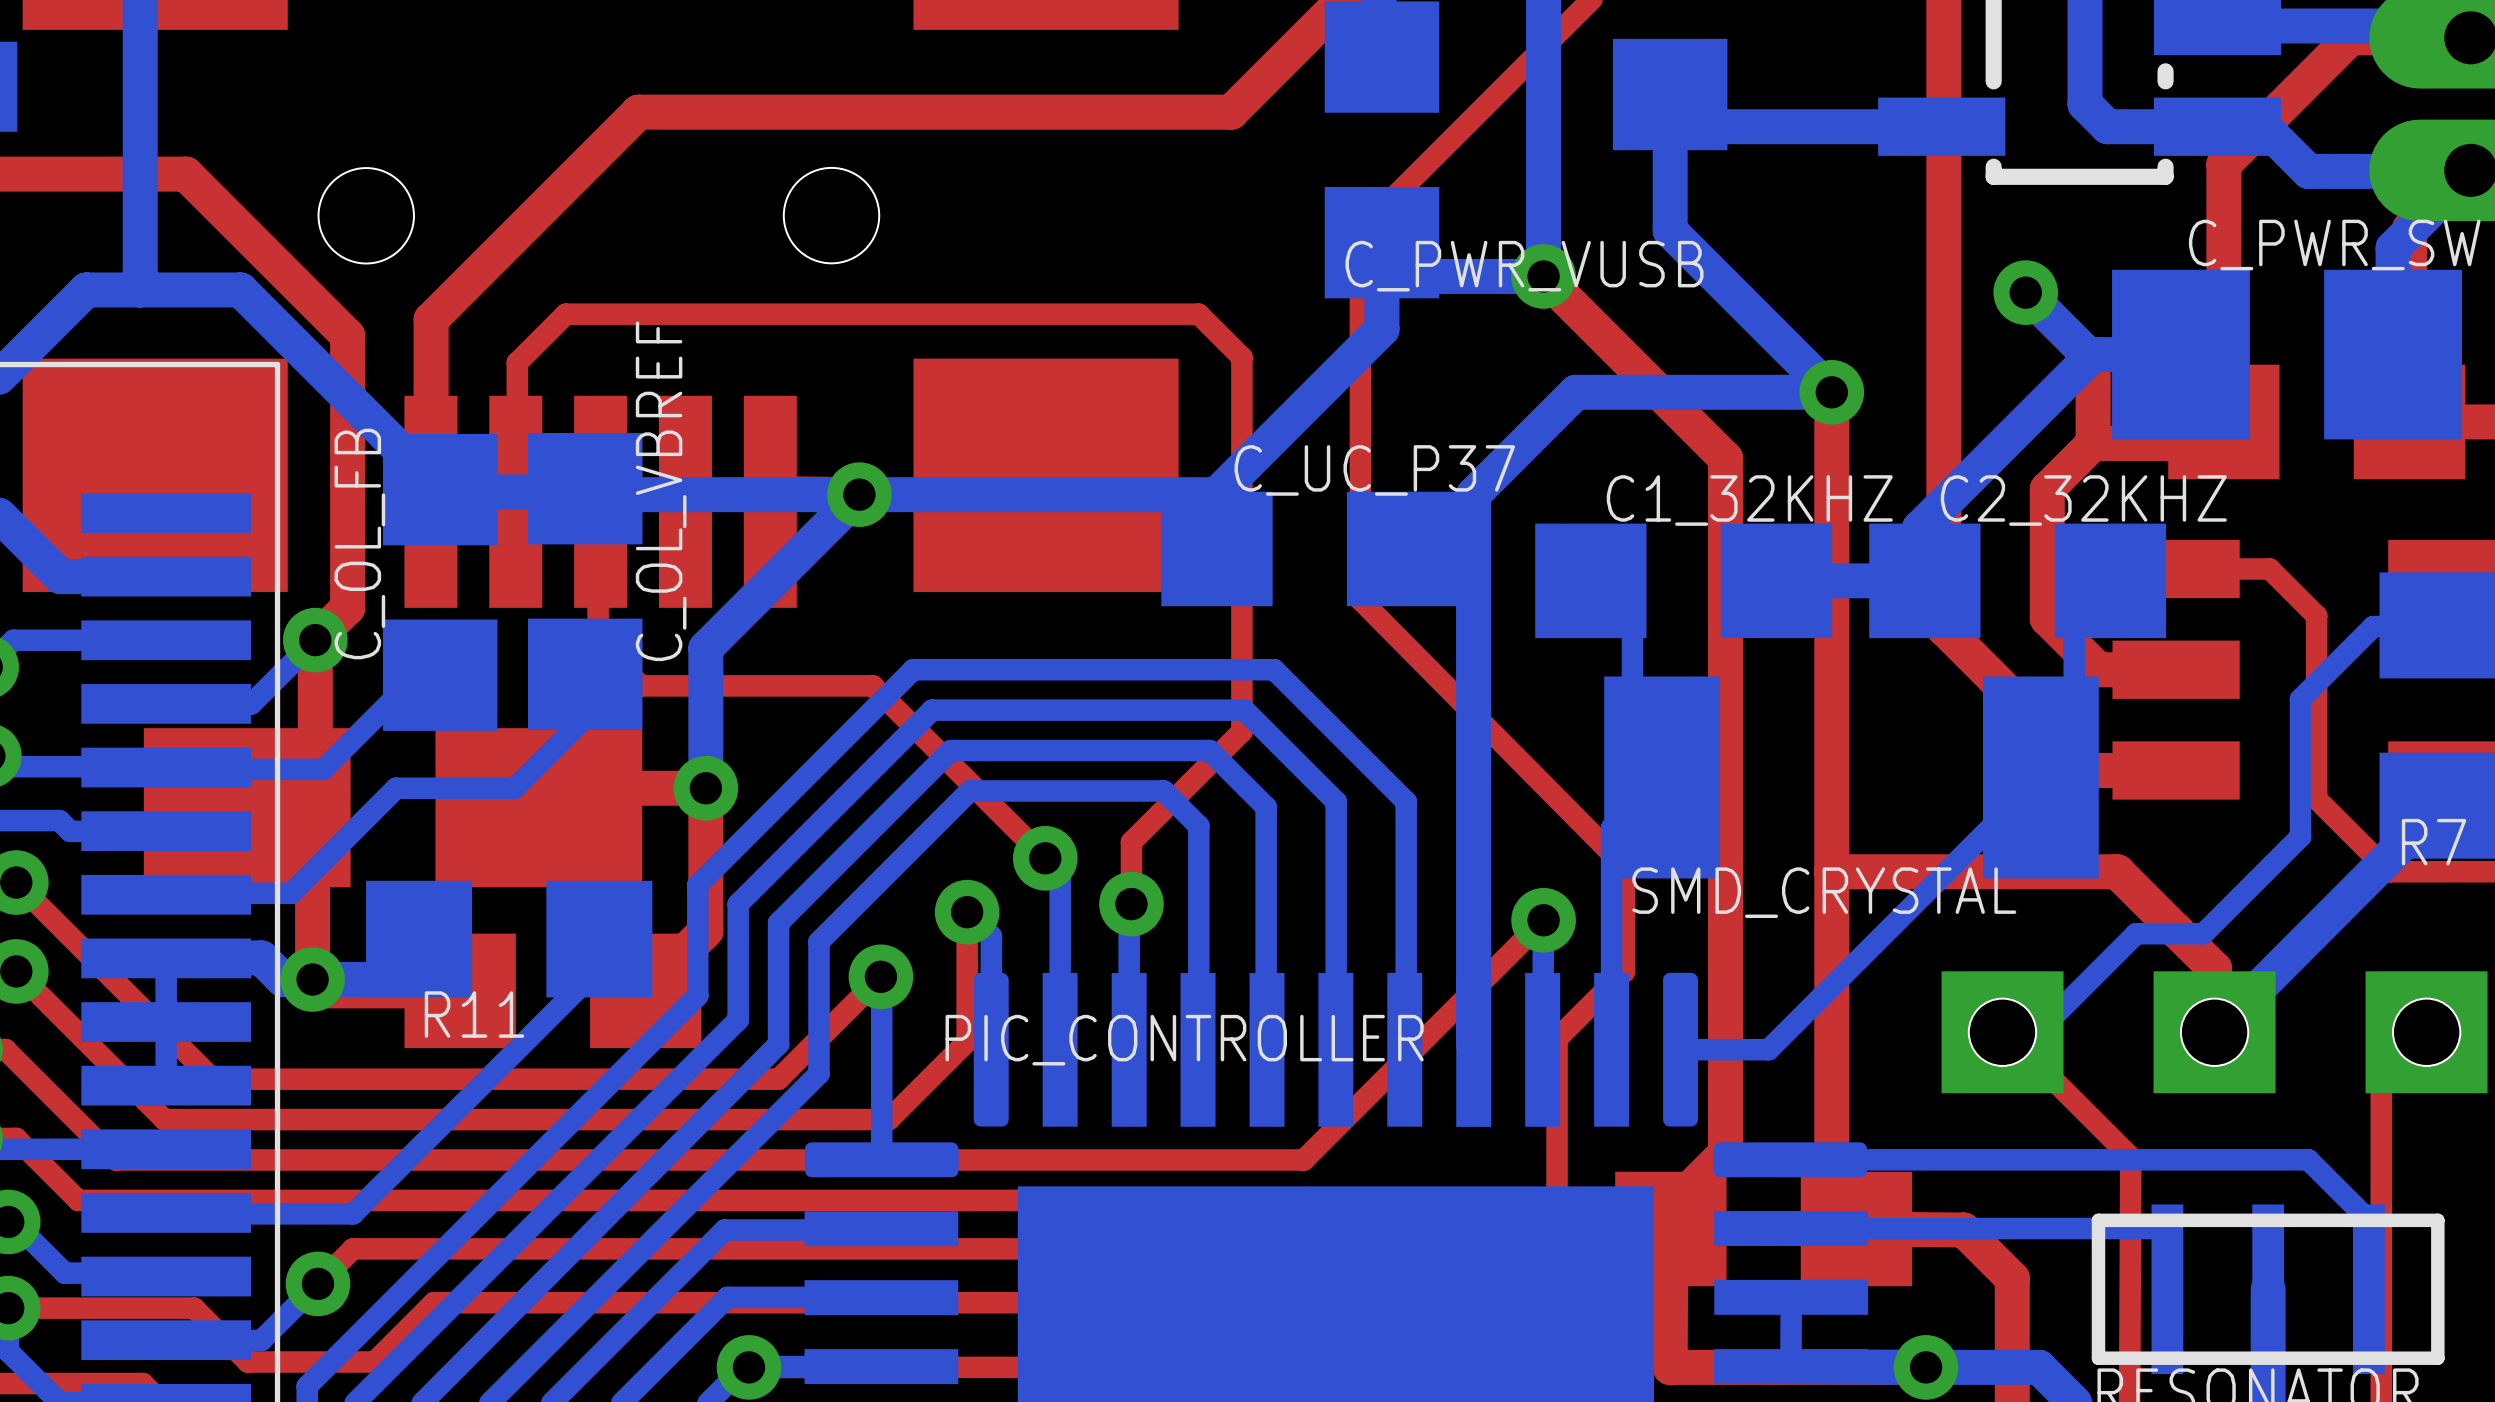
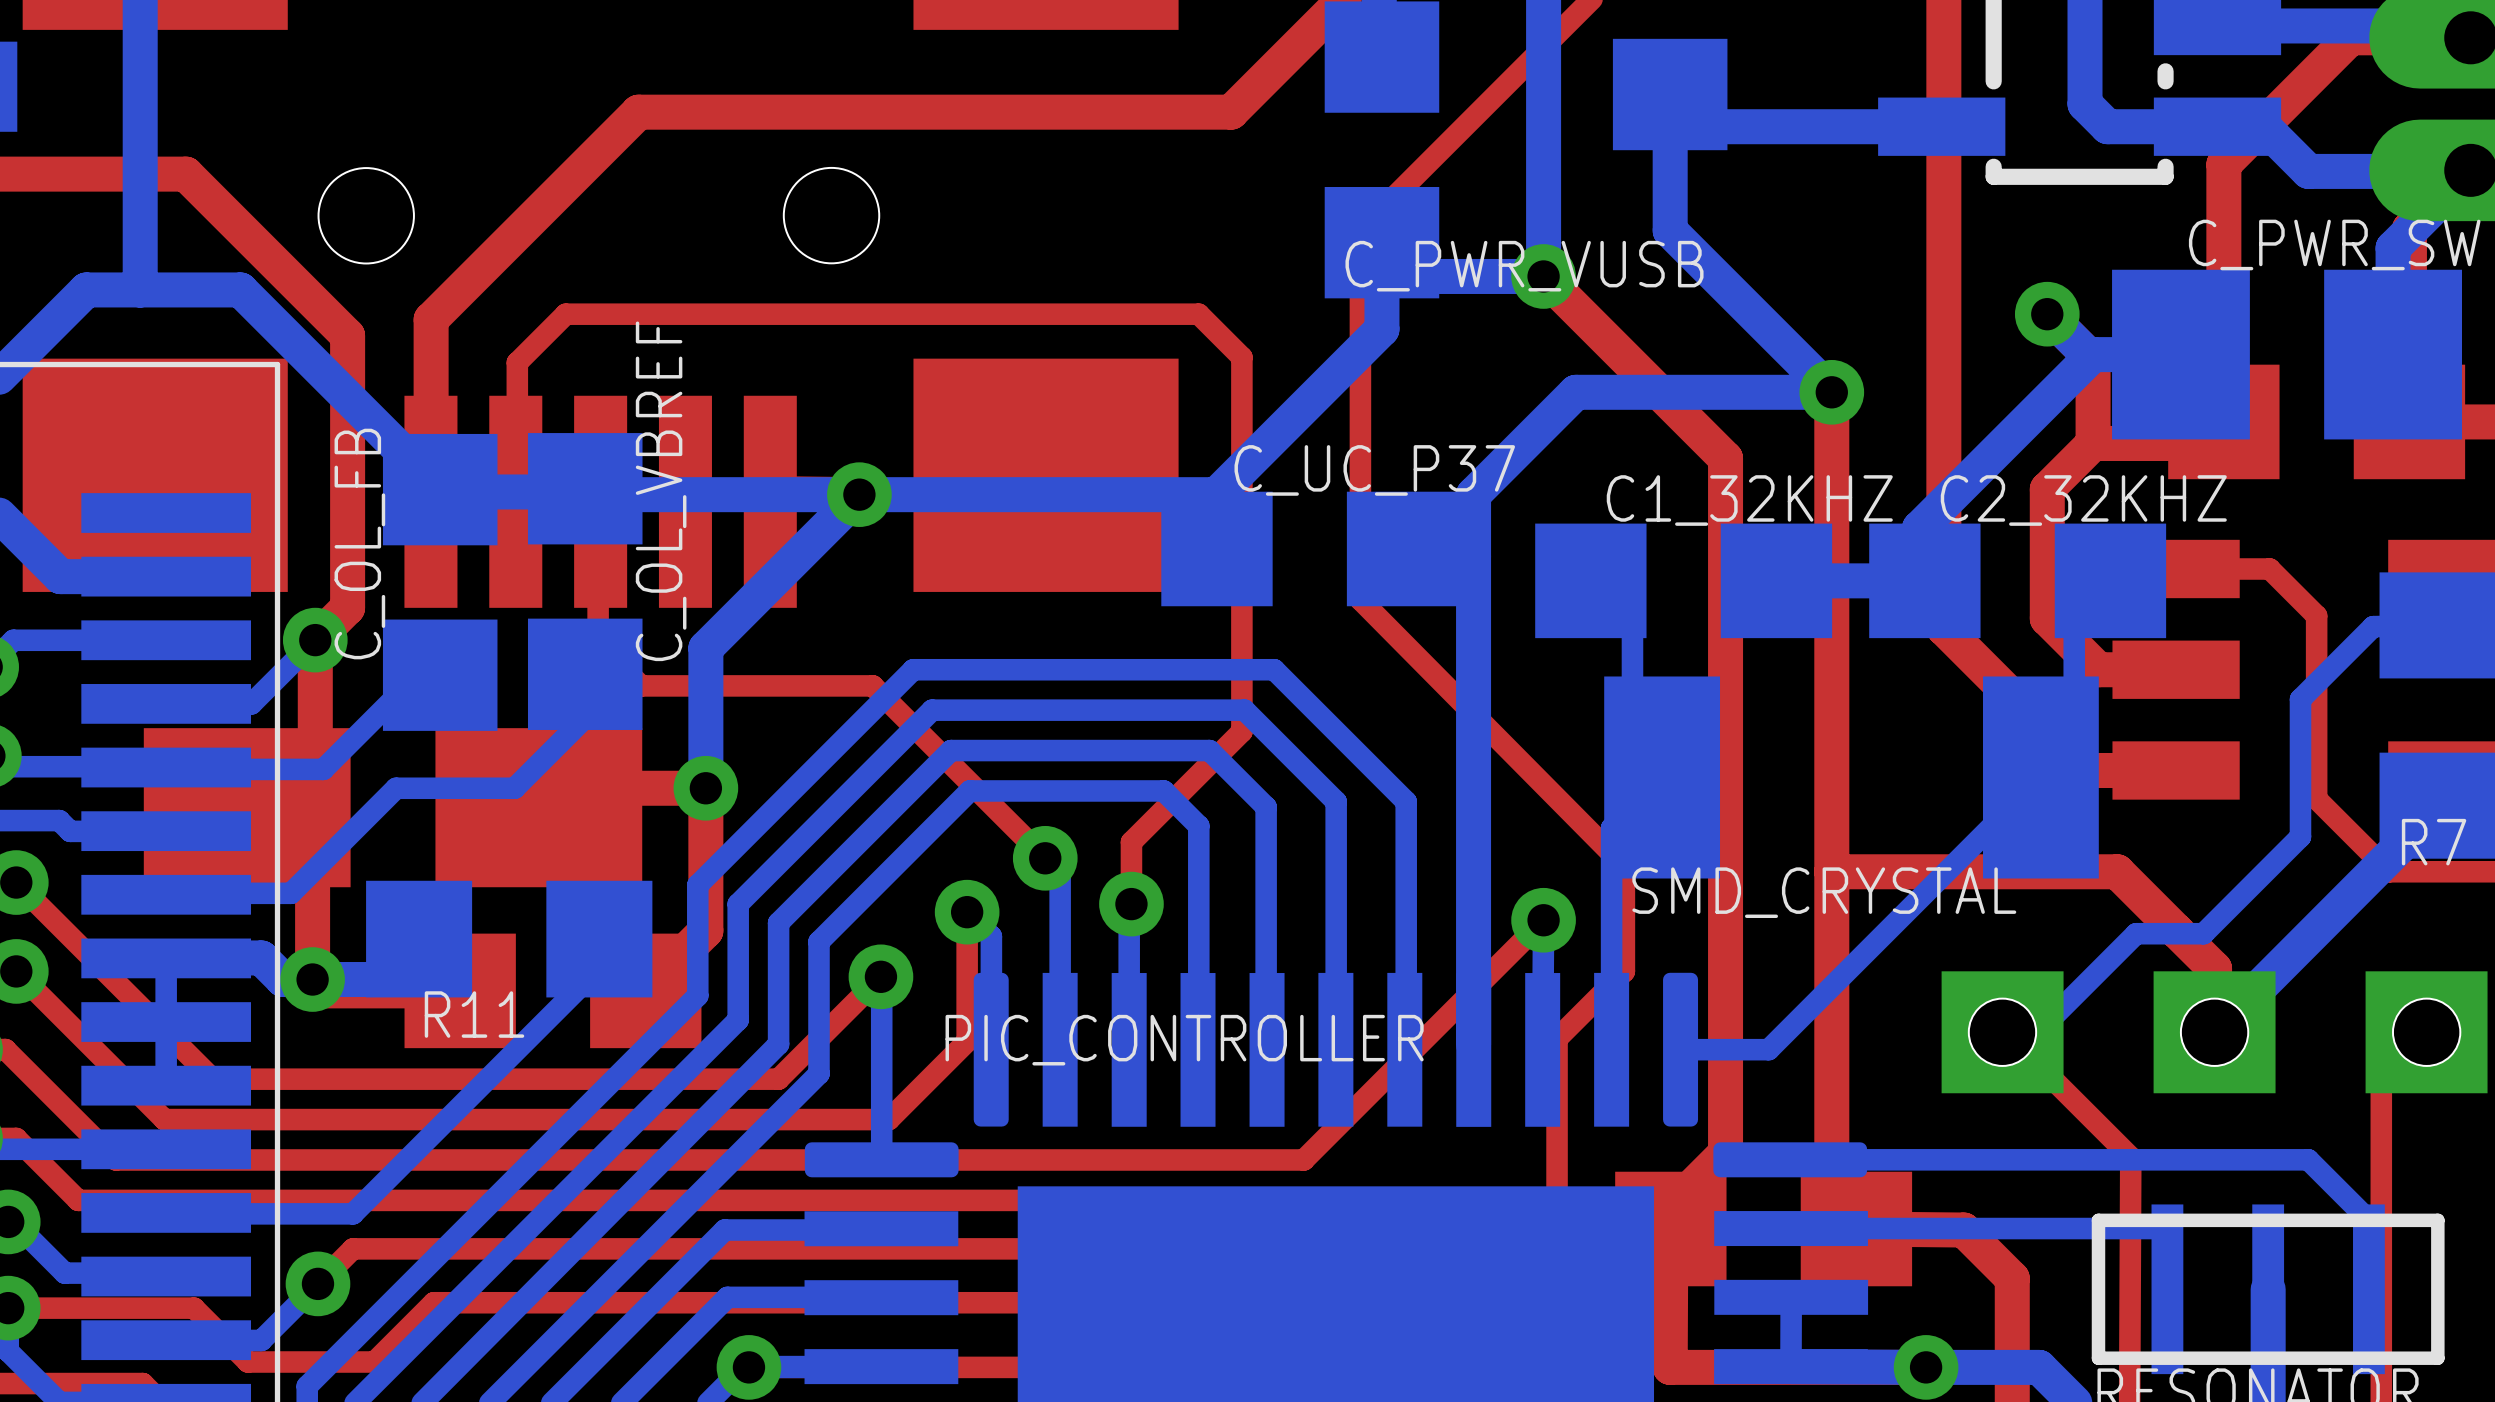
via position: (2025, 292) -> (2047, 314)

